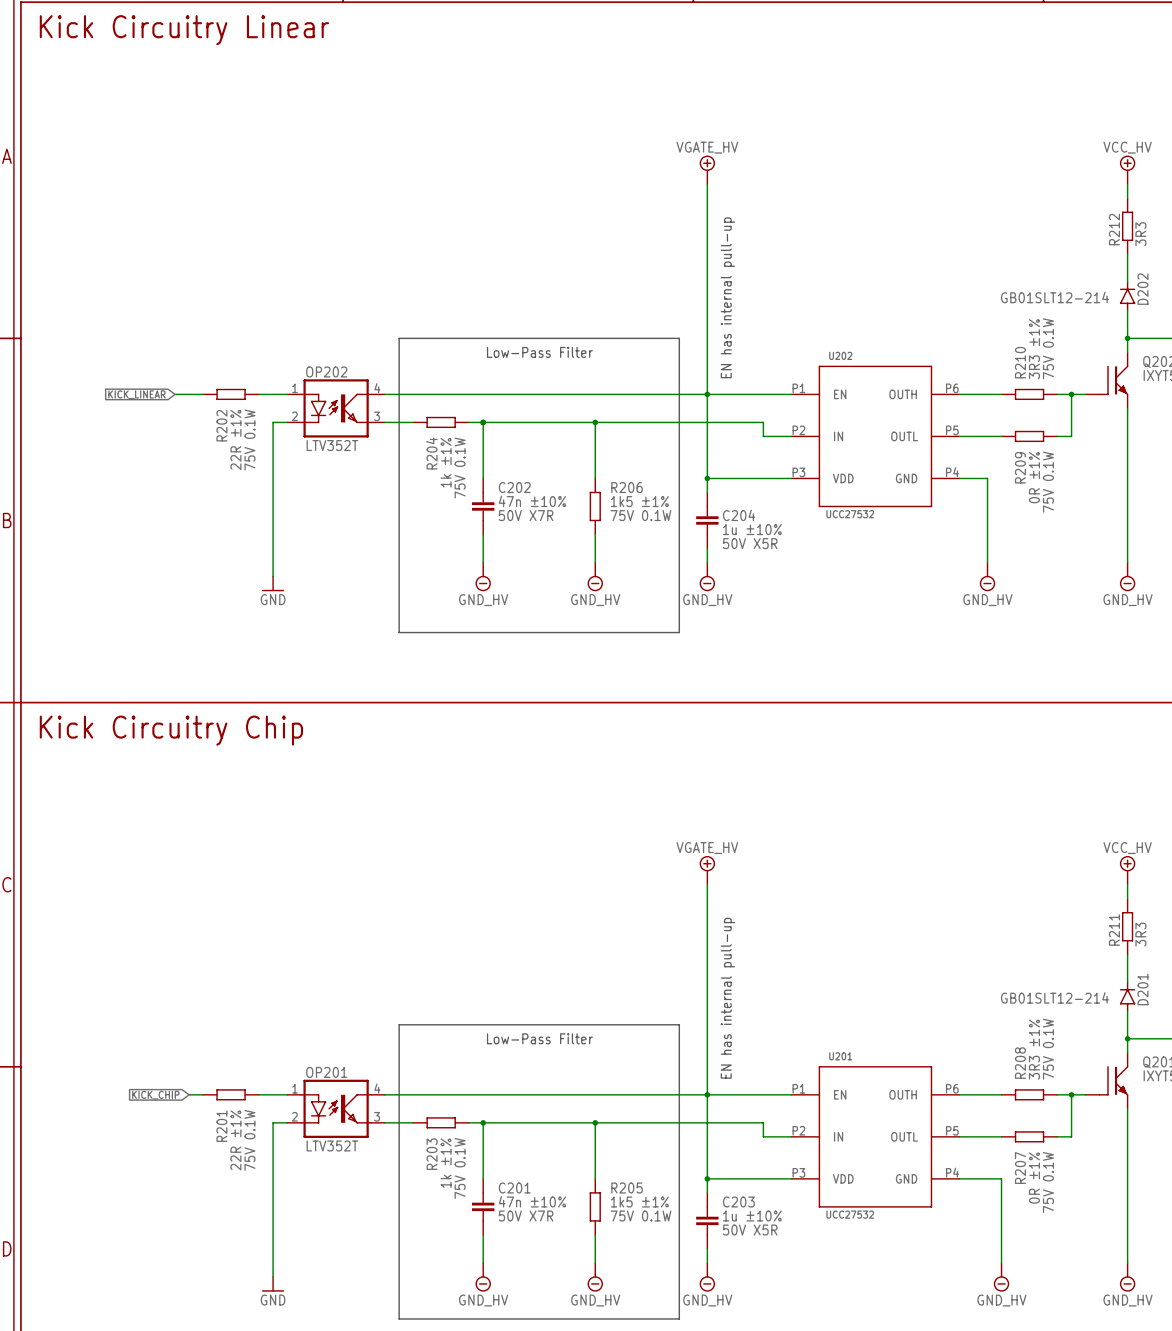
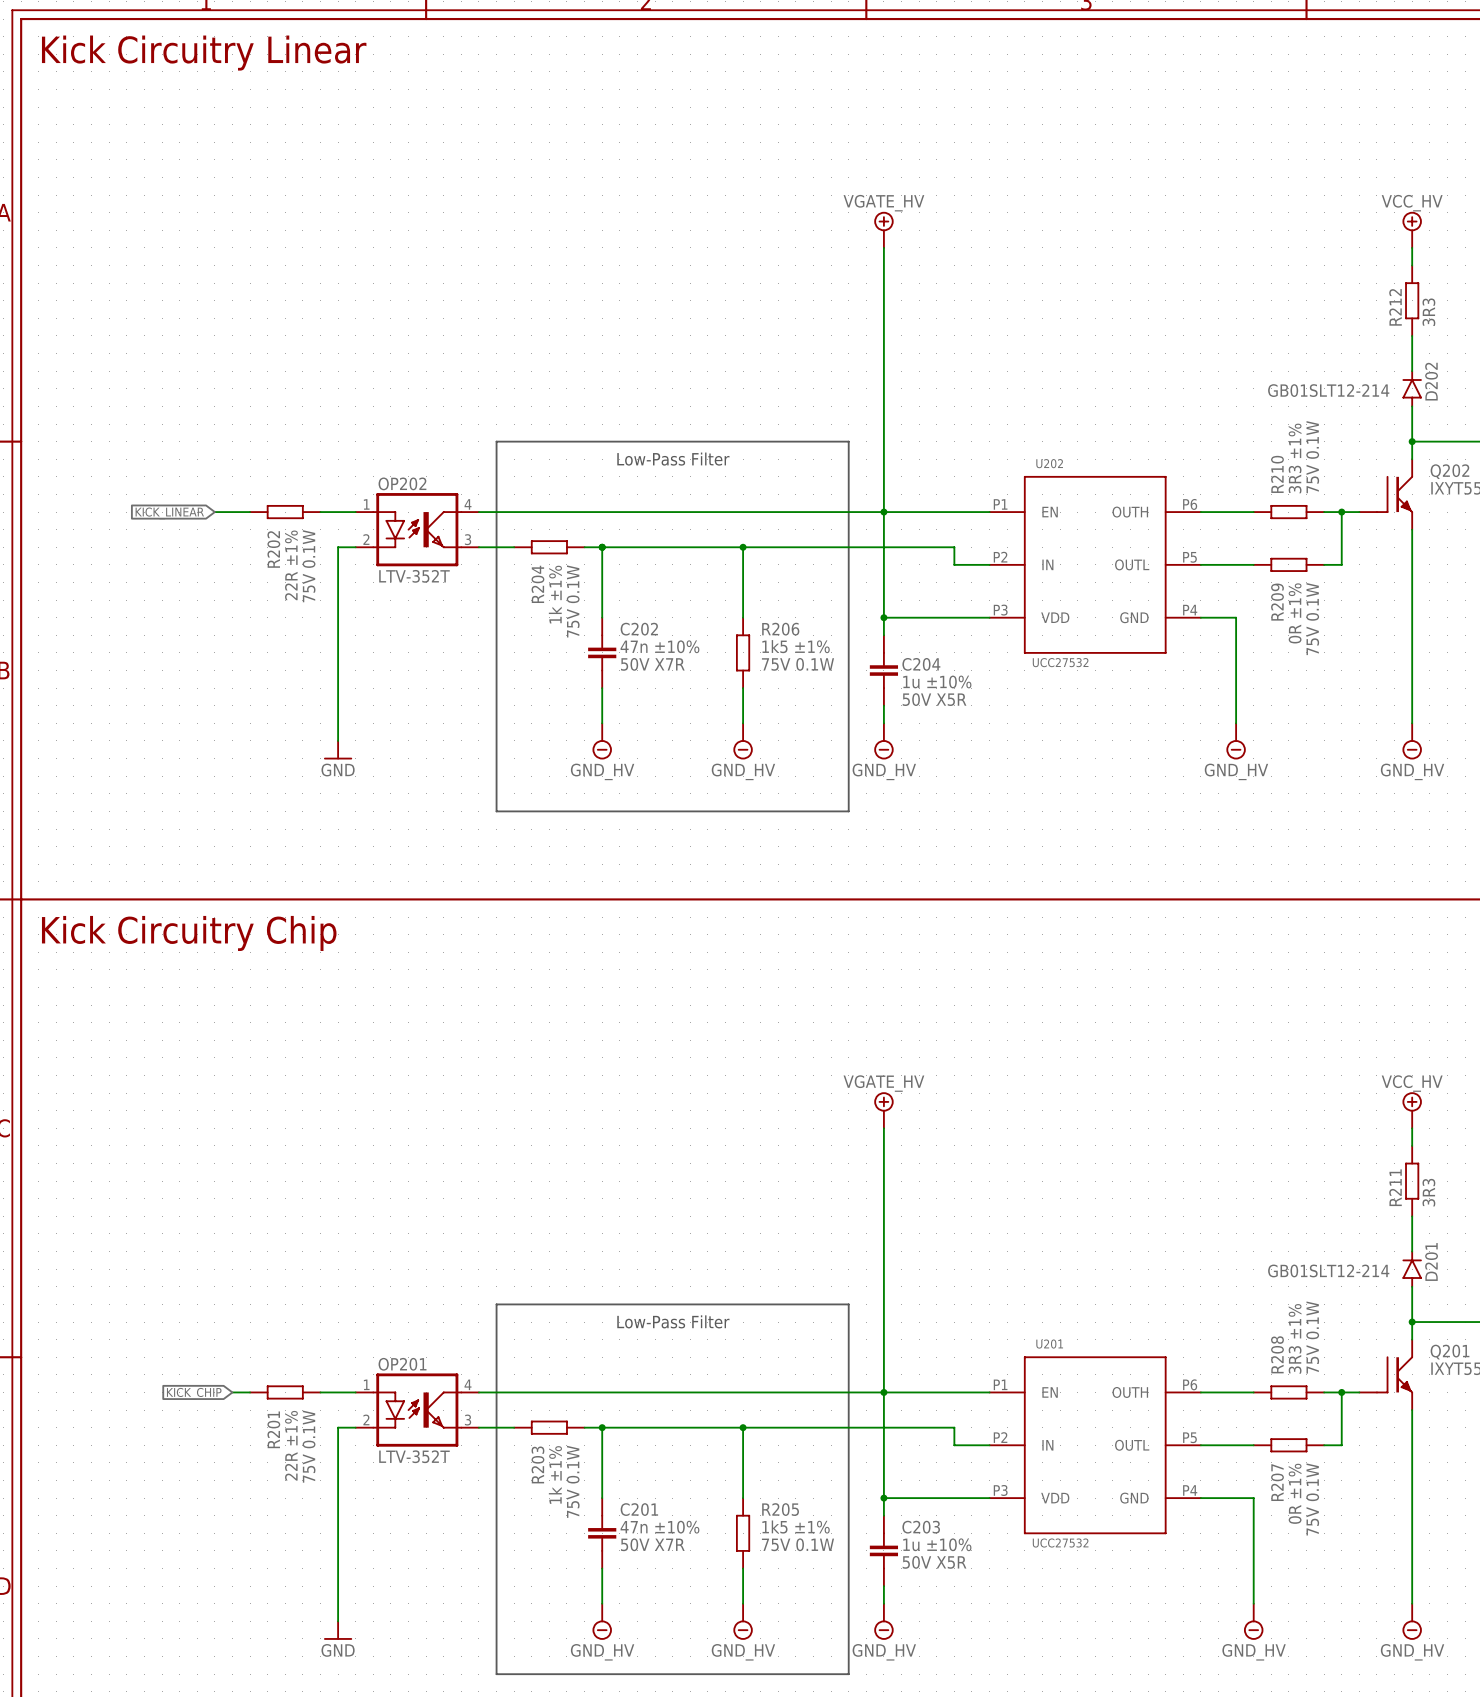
text: EN has internal pull-up (727, 297) -> none
OP202 value: LTV352T (332, 445) -> LTV-352T (414, 576)
text: EN has internal pull-up (727, 998) -> none
OP201 value: LTV352T (332, 1145) -> LTV-352T (414, 1456)

